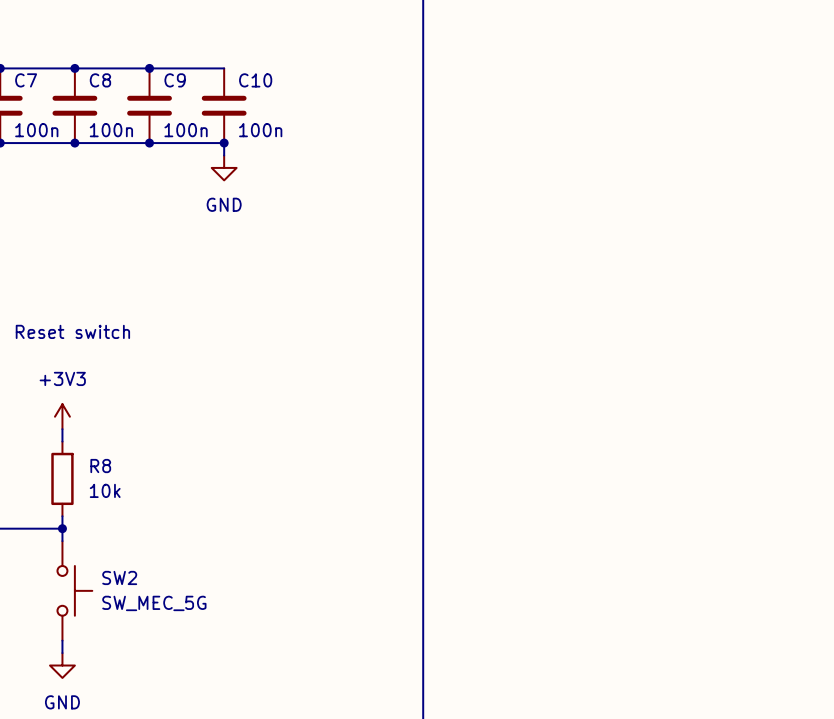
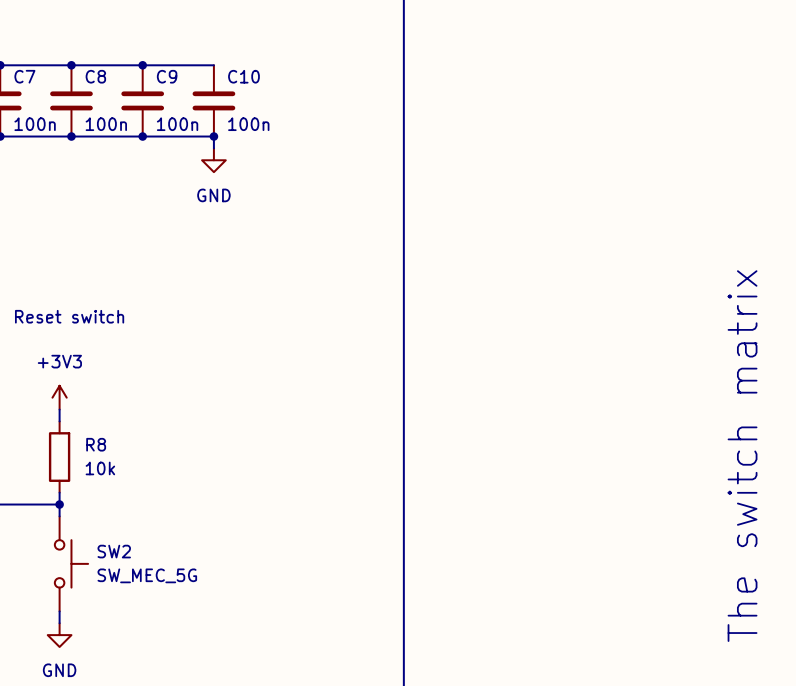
text: none -> The switch matrix (742, 456)

